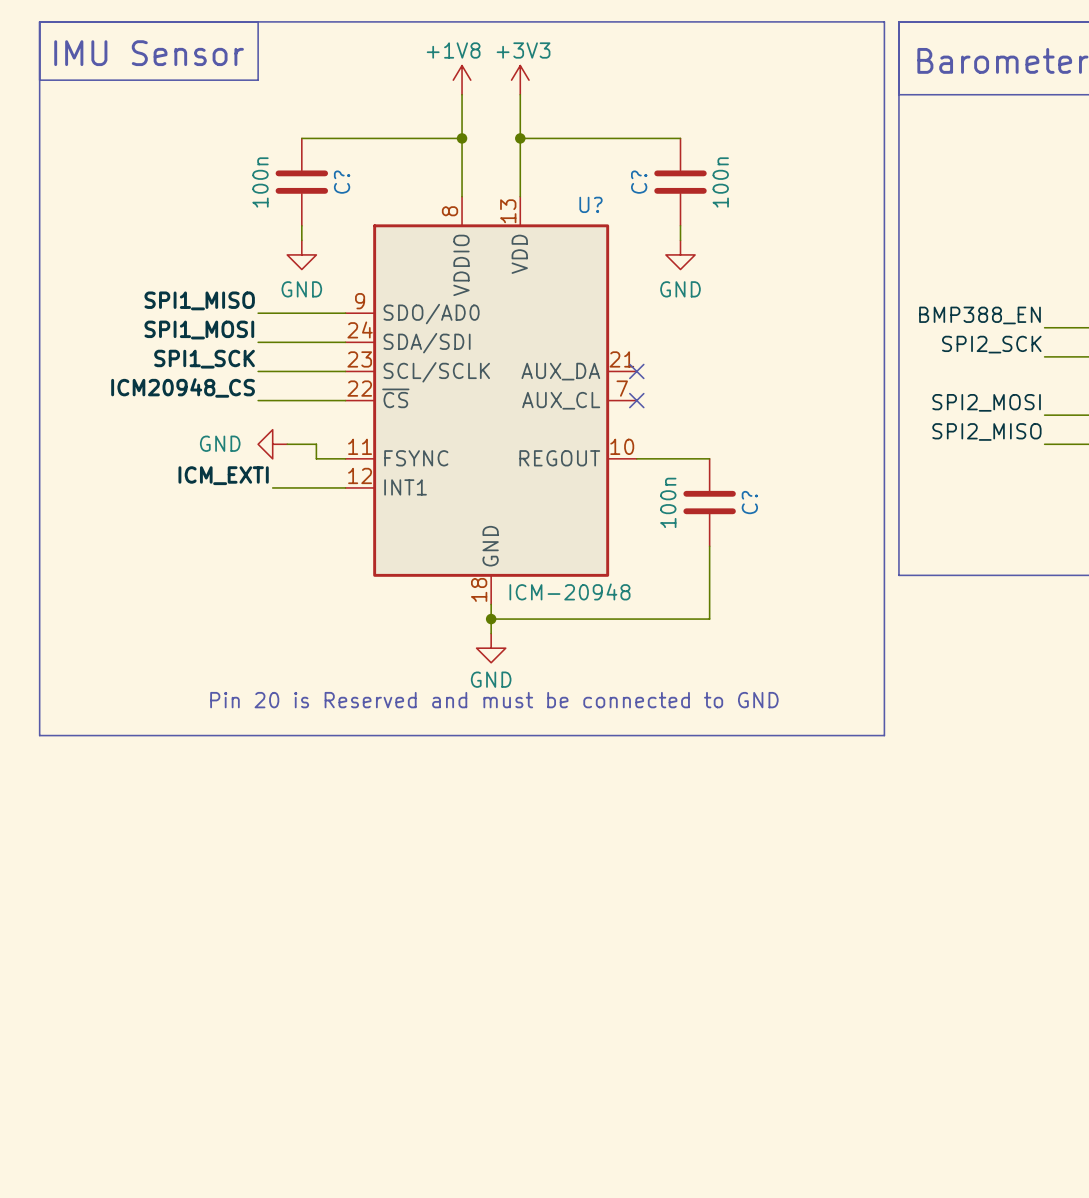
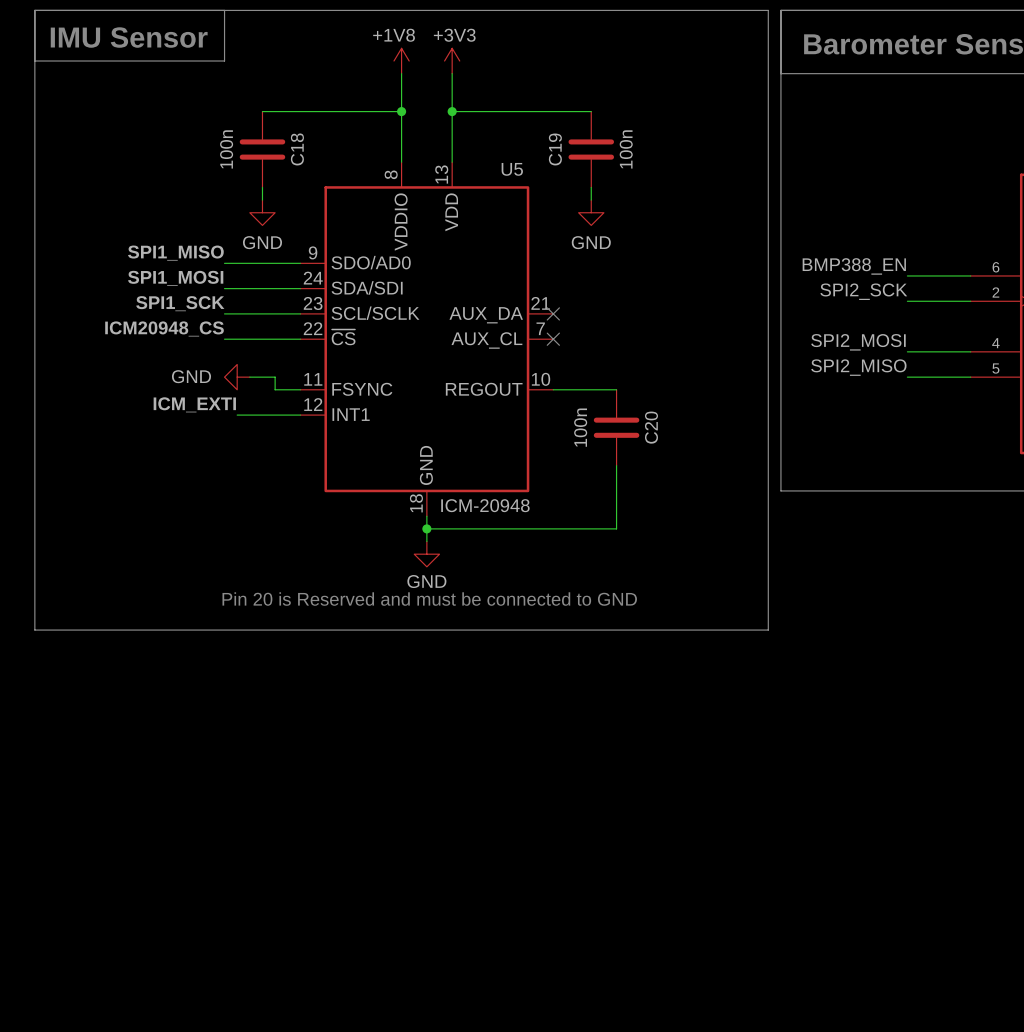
C? name: C? (342, 182) -> C18 (297, 149)
C? name: C? (639, 182) -> C19 (555, 149)
U? name: U? (591, 204) -> U5 (512, 169)
C? name: C? (749, 502) -> C20 (651, 427)

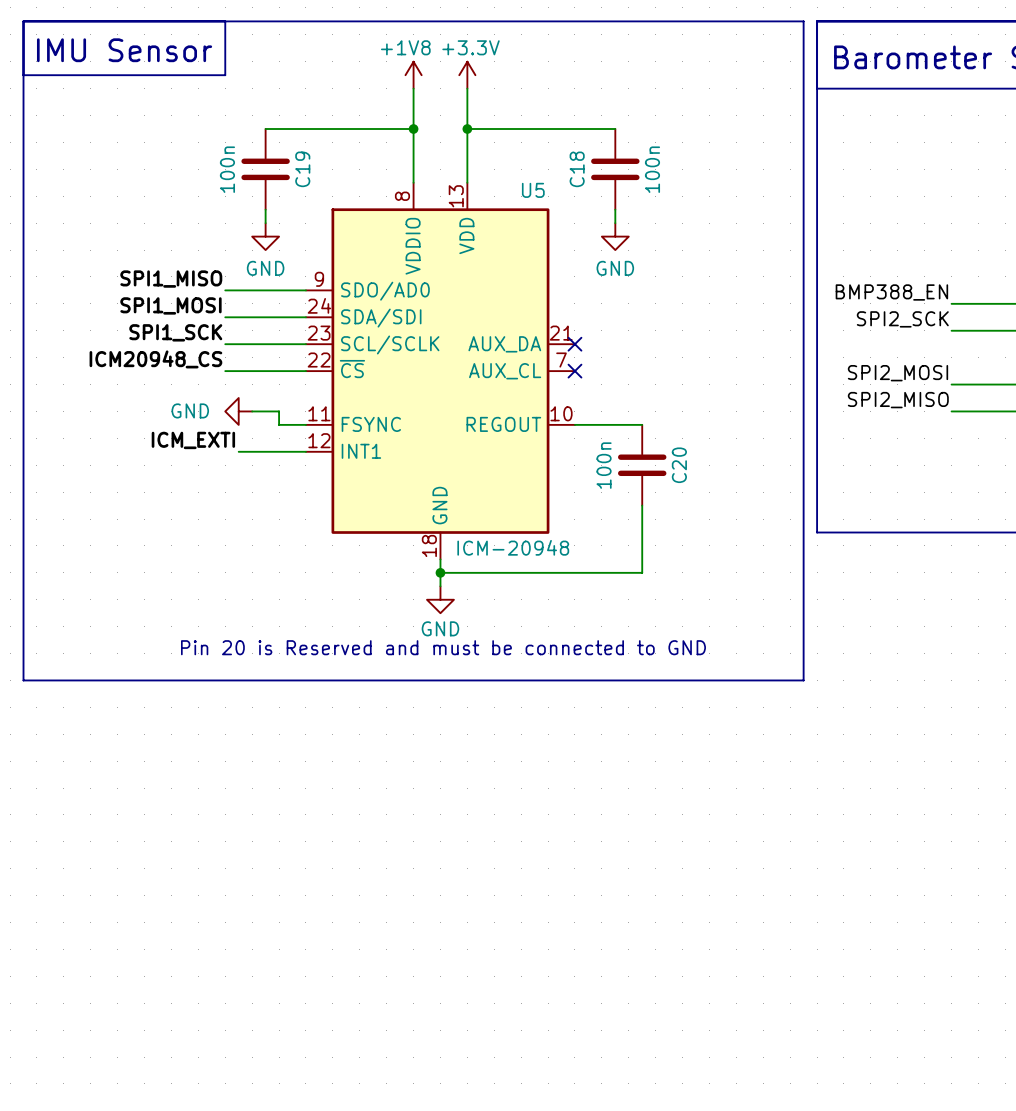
power symbol: +3V3 (452, 61) -> +3.3V (467, 75)
C18 name: C18 (297, 149) -> C19 (302, 169)
C19 name: C19 (555, 149) -> C18 (577, 169)

